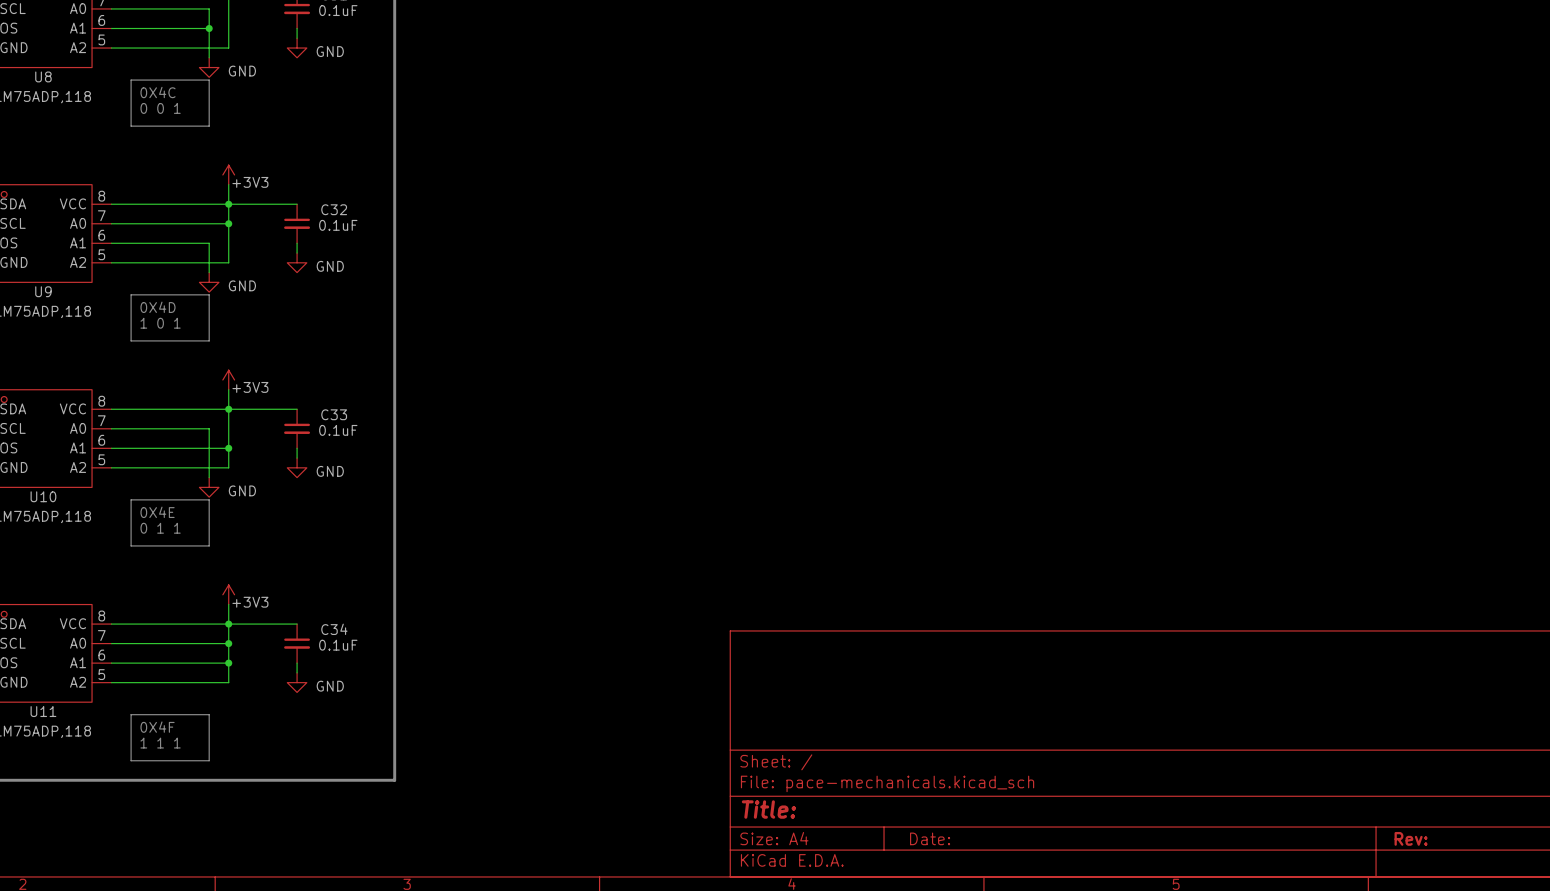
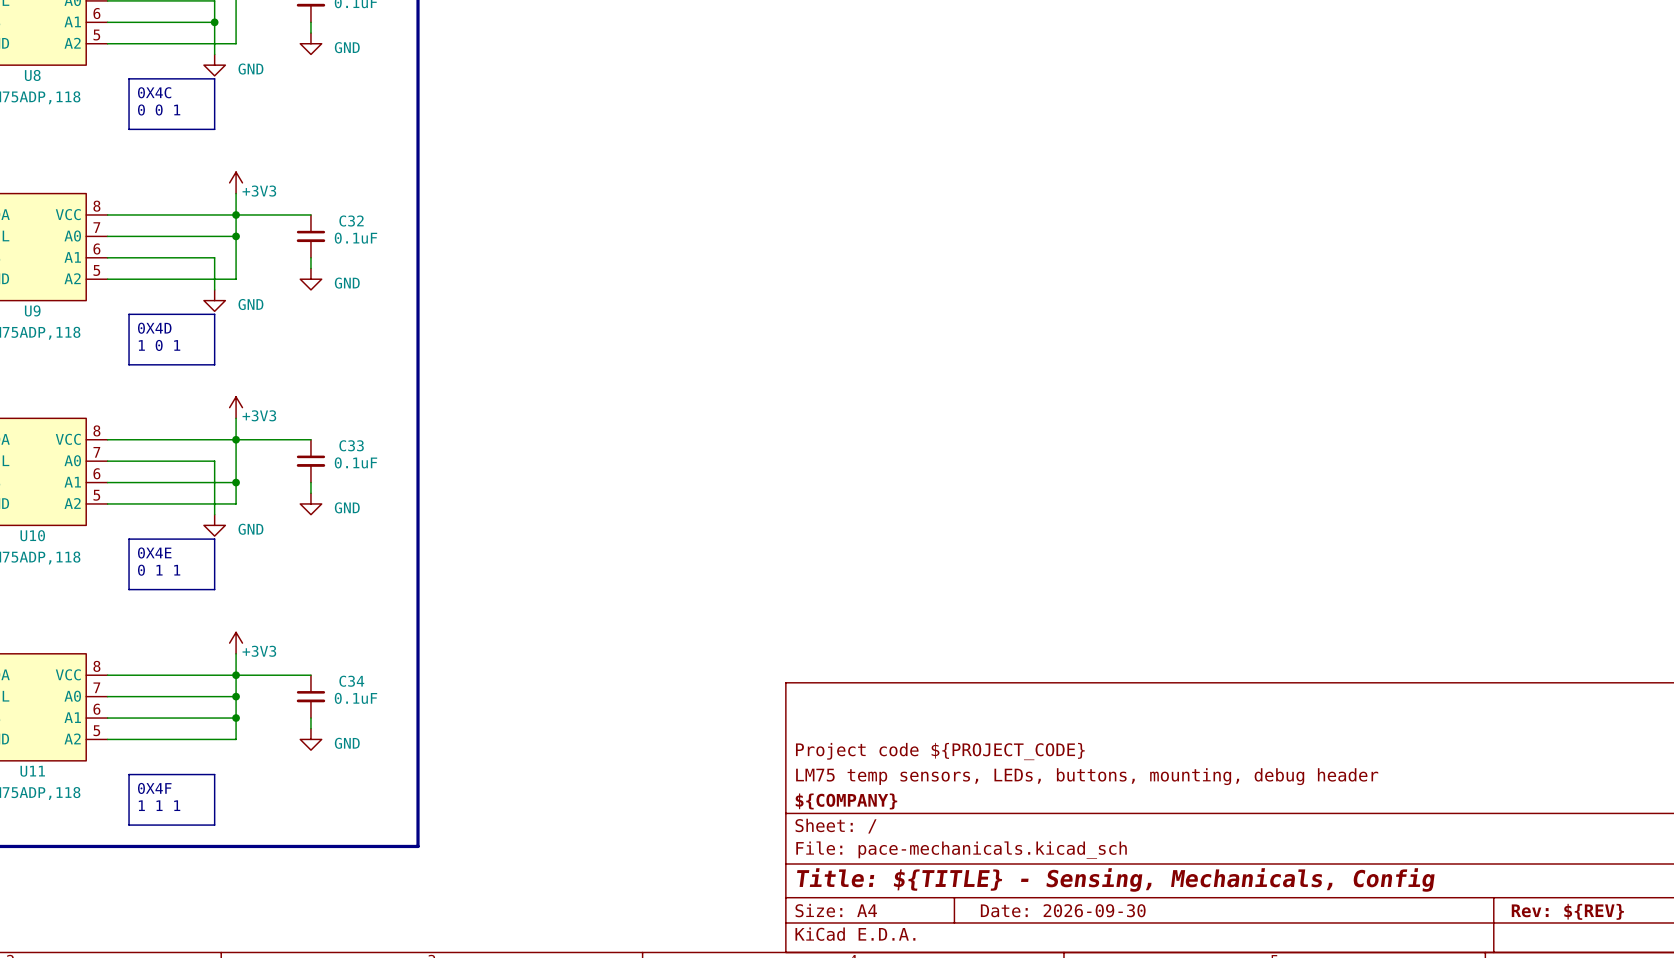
title block: none -> Project code ${PROJECT_CODE} (940, 751)
title block: none -> LM75 temp sensors, LEDs, buttons, mounting, debug header (1087, 776)
title block: none -> ${COMPANY} (846, 801)
title block: Title: (768, 809) -> Title: ${TITLE} - Sensing, Mechanicals, Config (1115, 879)
title block: Date: (930, 838) -> Date: 2026-09-30 (1063, 910)
title block: Rev: (1411, 838) -> Rev: ${REV} (1567, 911)

